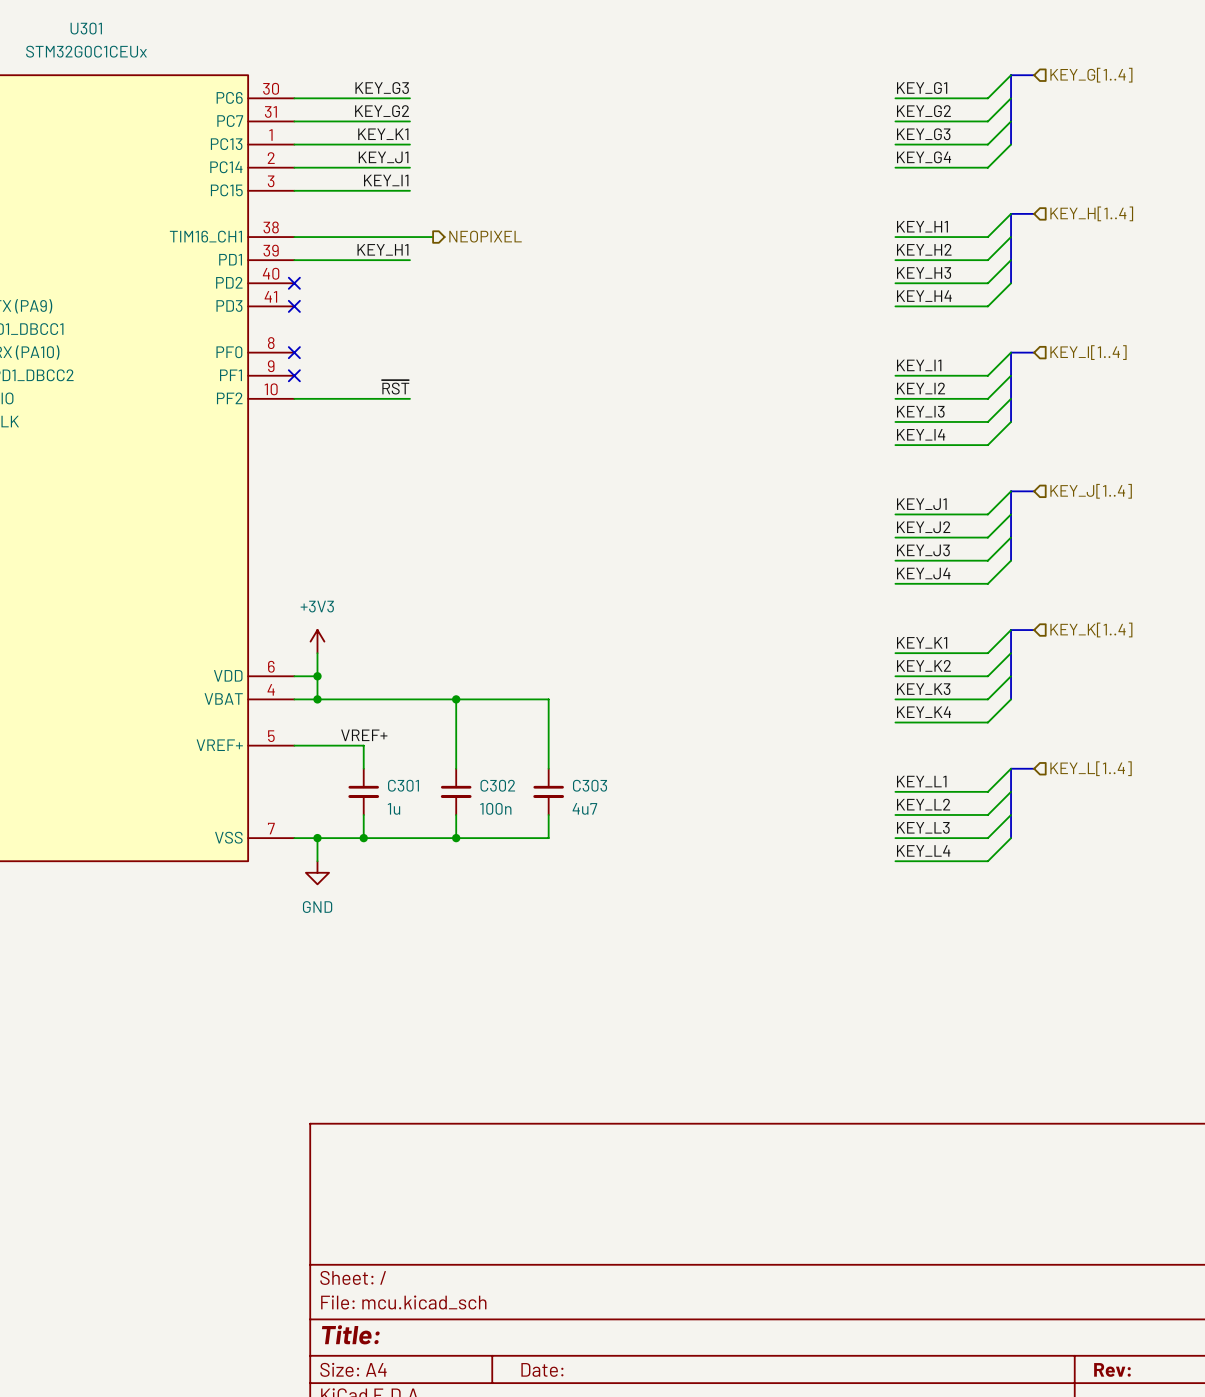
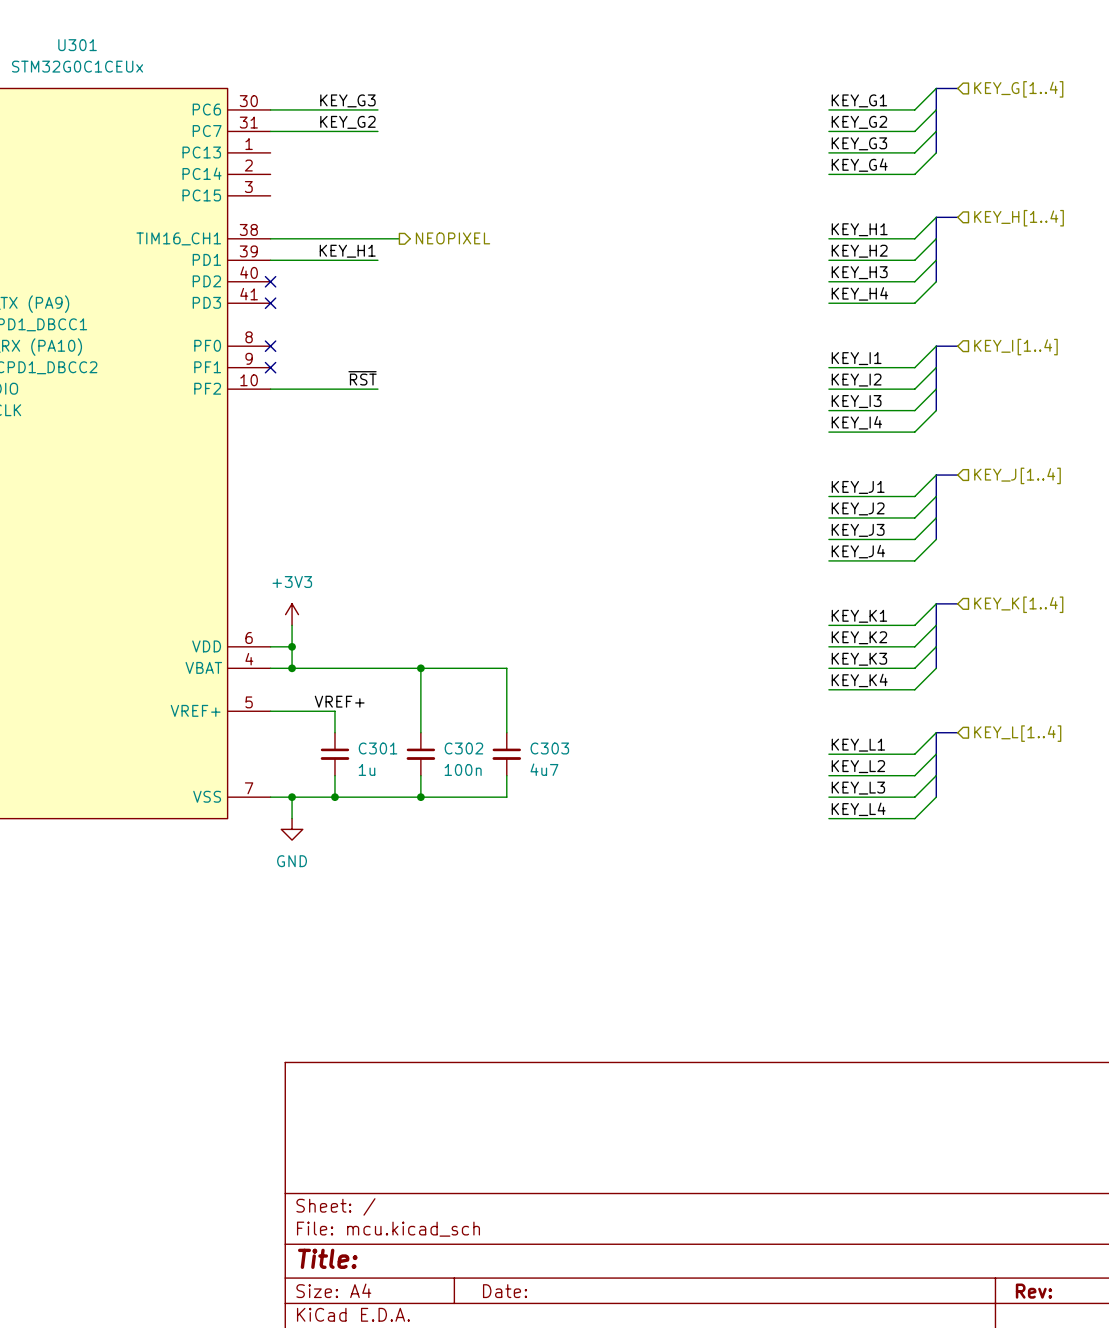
label: KEY_K1 (383, 134) -> none
wire: (294, 144) (409, 144) -> none
label: KEY_J1 (383, 157) -> none
wire: (294, 167) (409, 167) -> none
label: KEY_I1 (386, 180) -> none
wire: (294, 190) (409, 190) -> none

